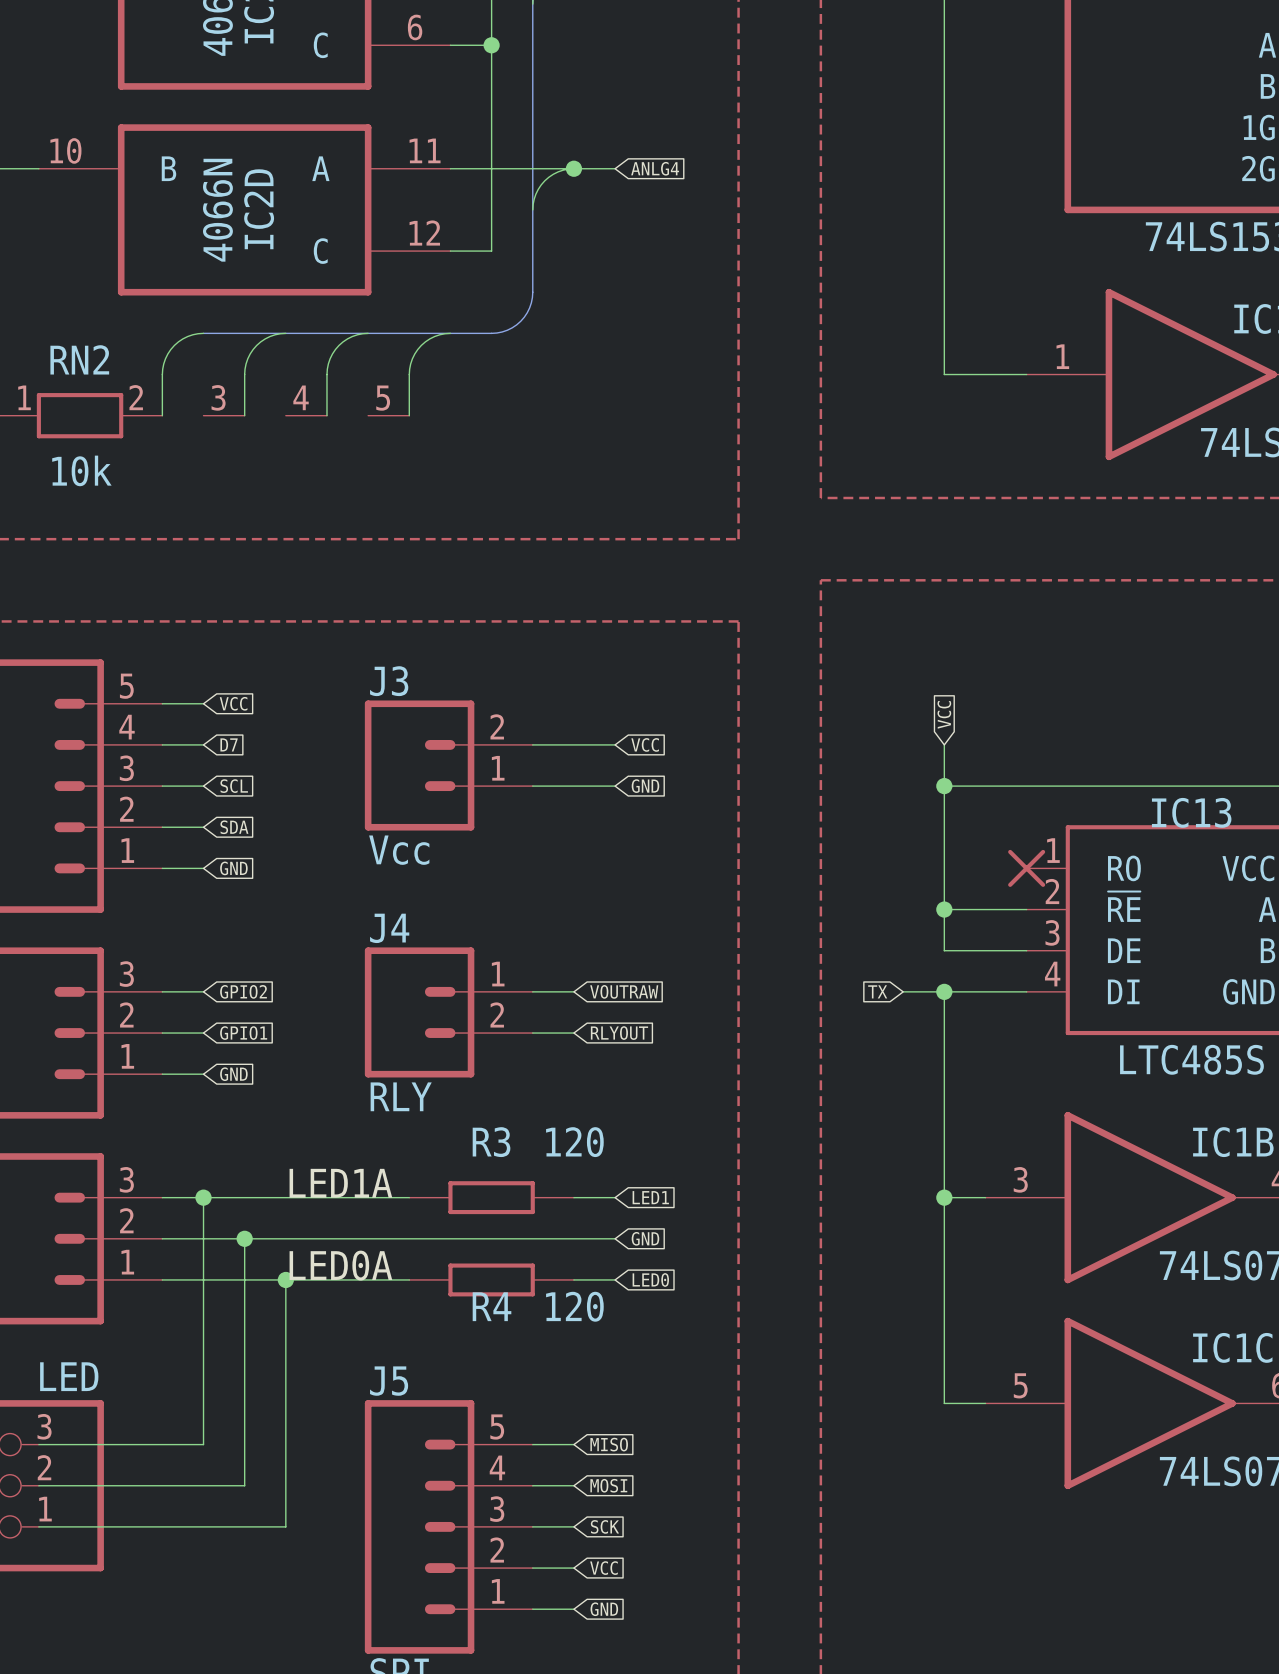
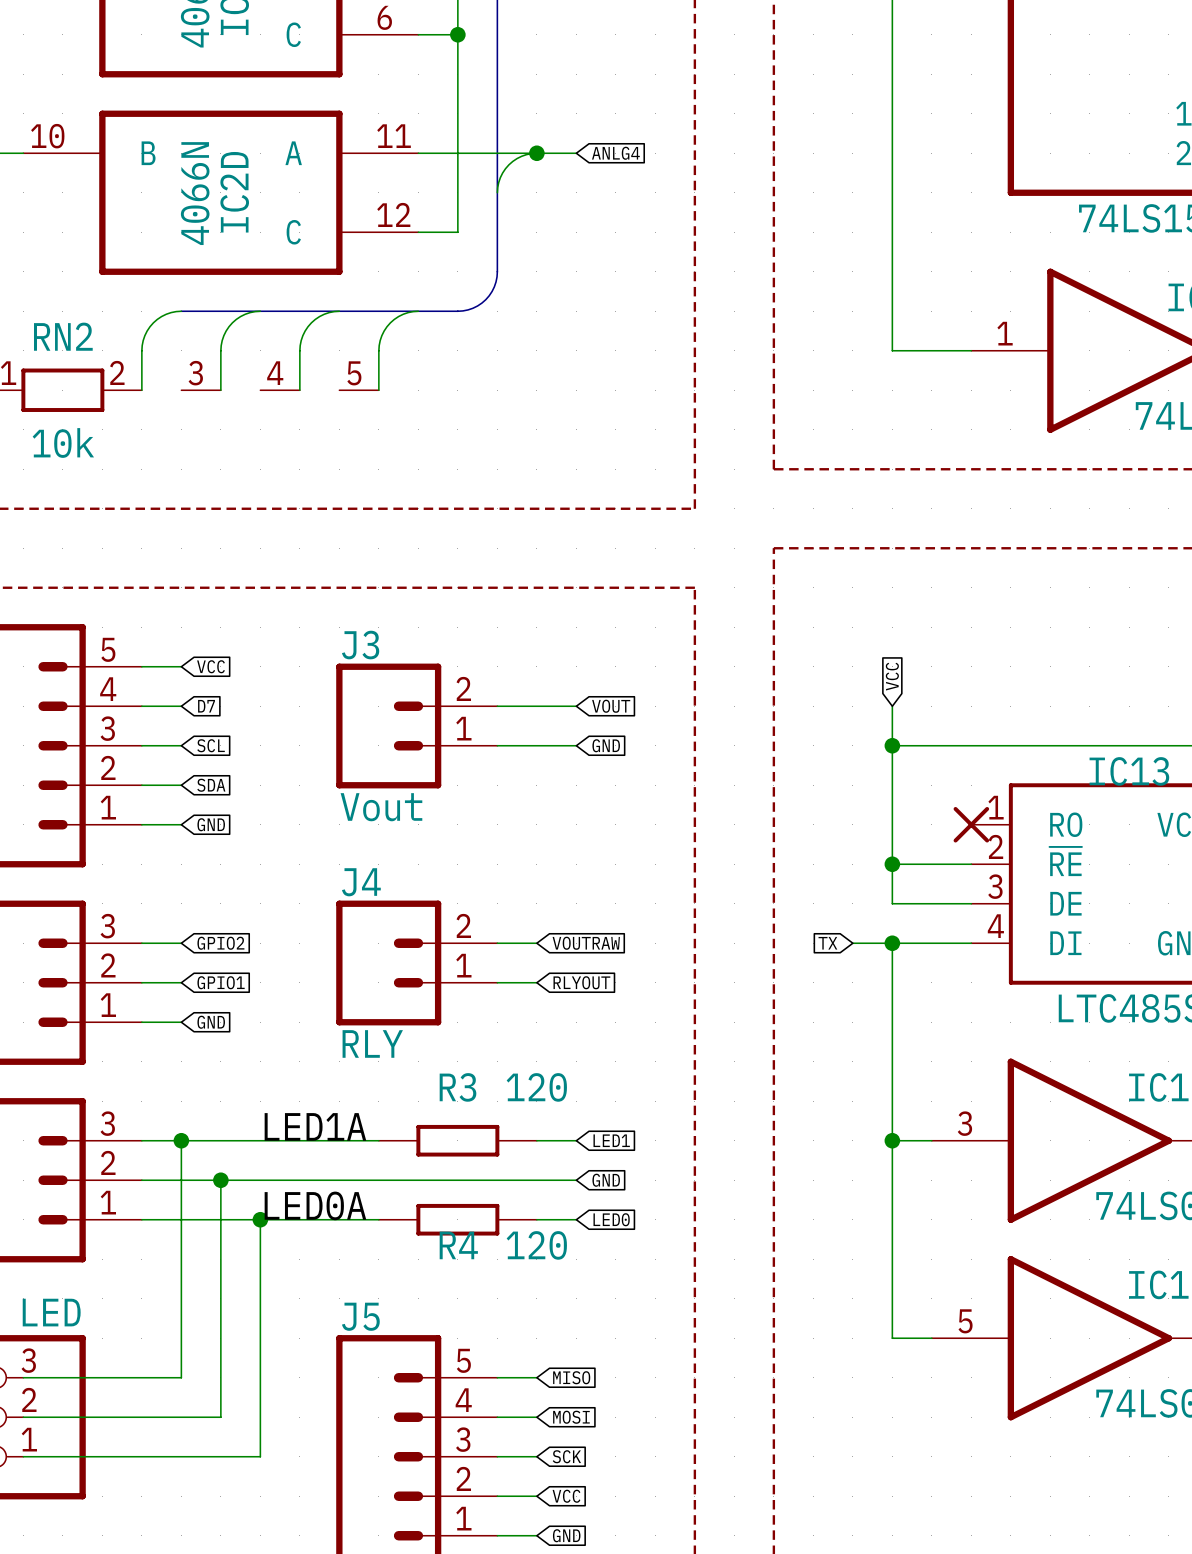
global label: VCC (645, 744) -> VOUT (611, 706)
J3 value: Vcc (399, 850) -> Vout (381, 807)
J4 flip: as is (419, 1012) -> up-down (388, 962)

